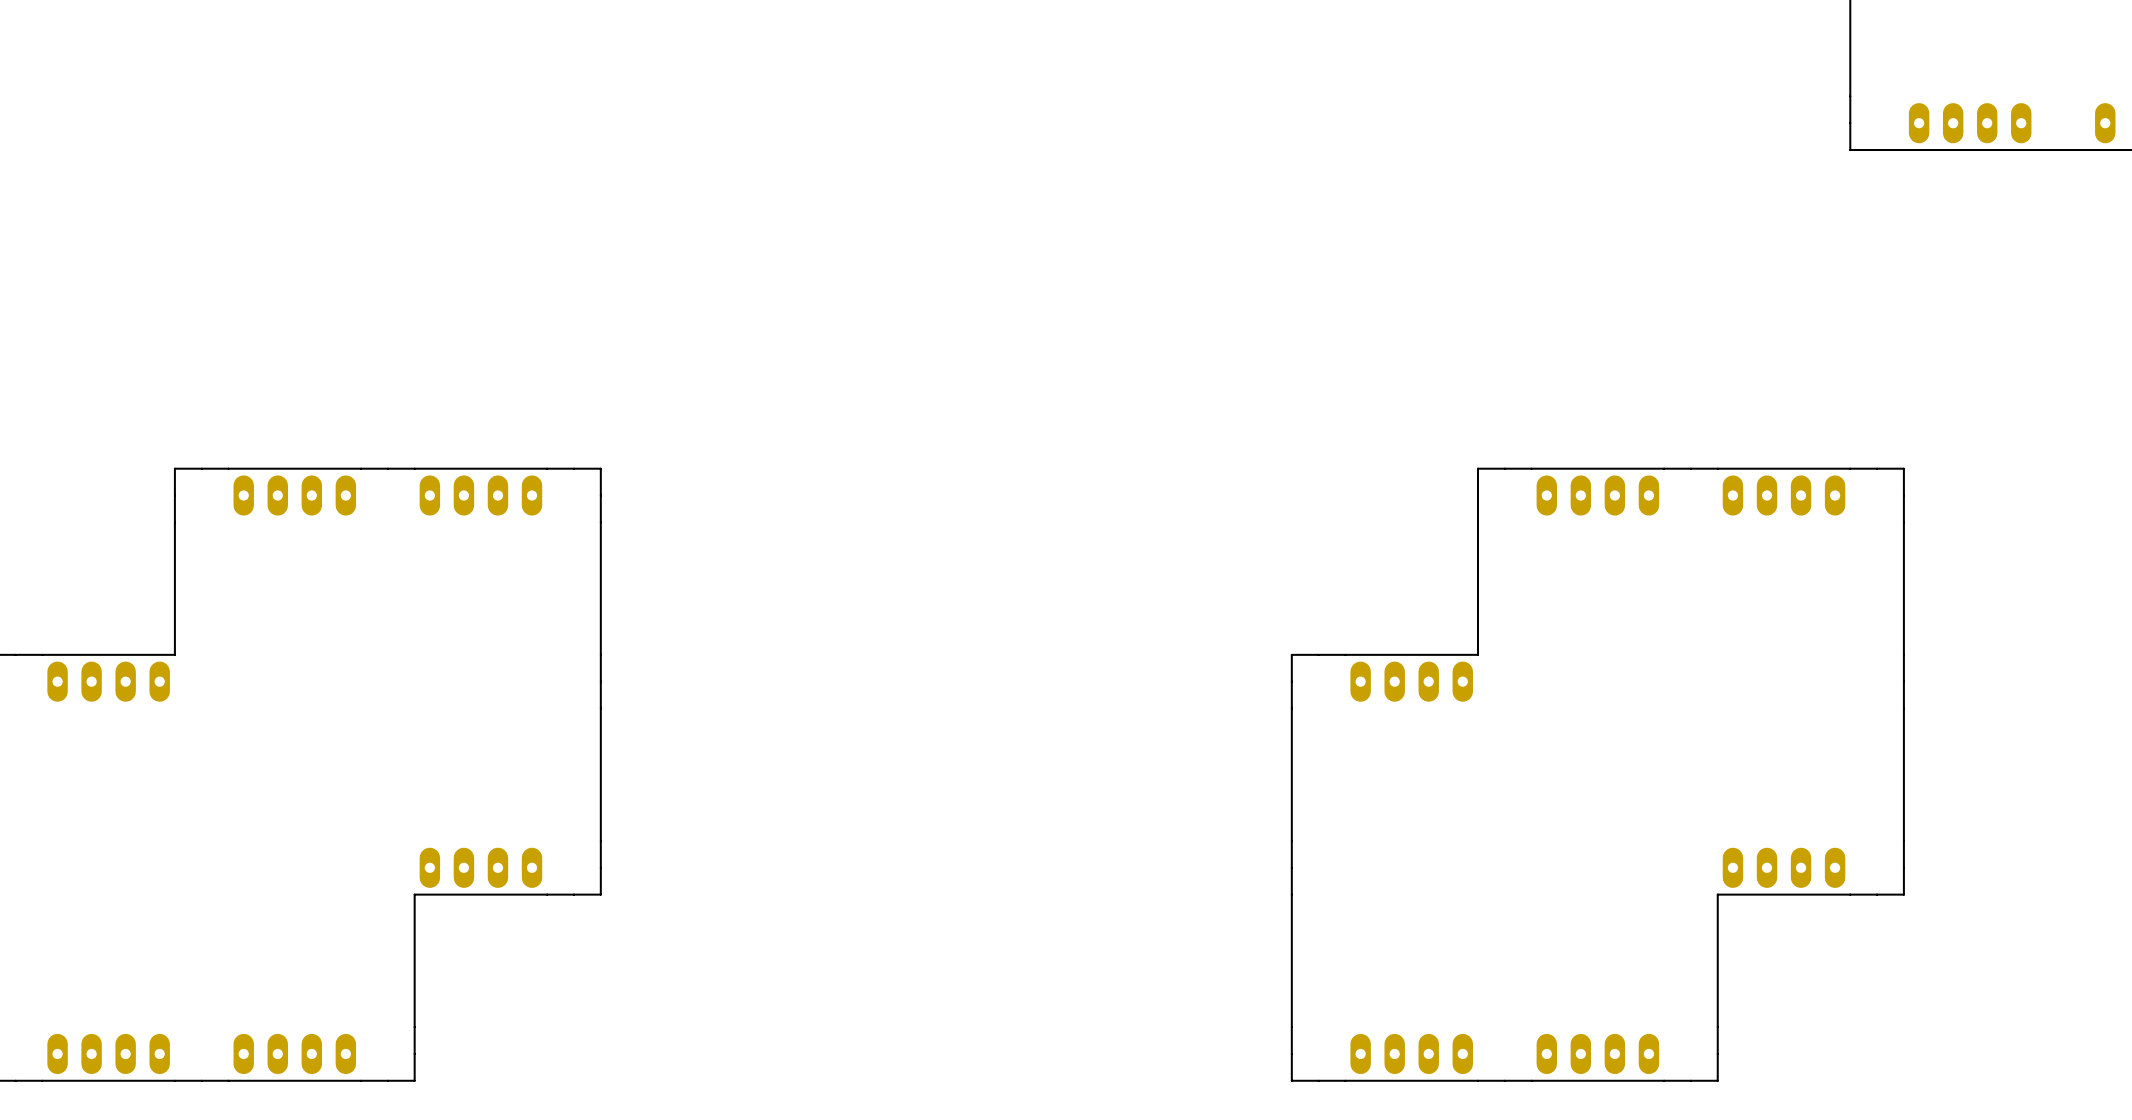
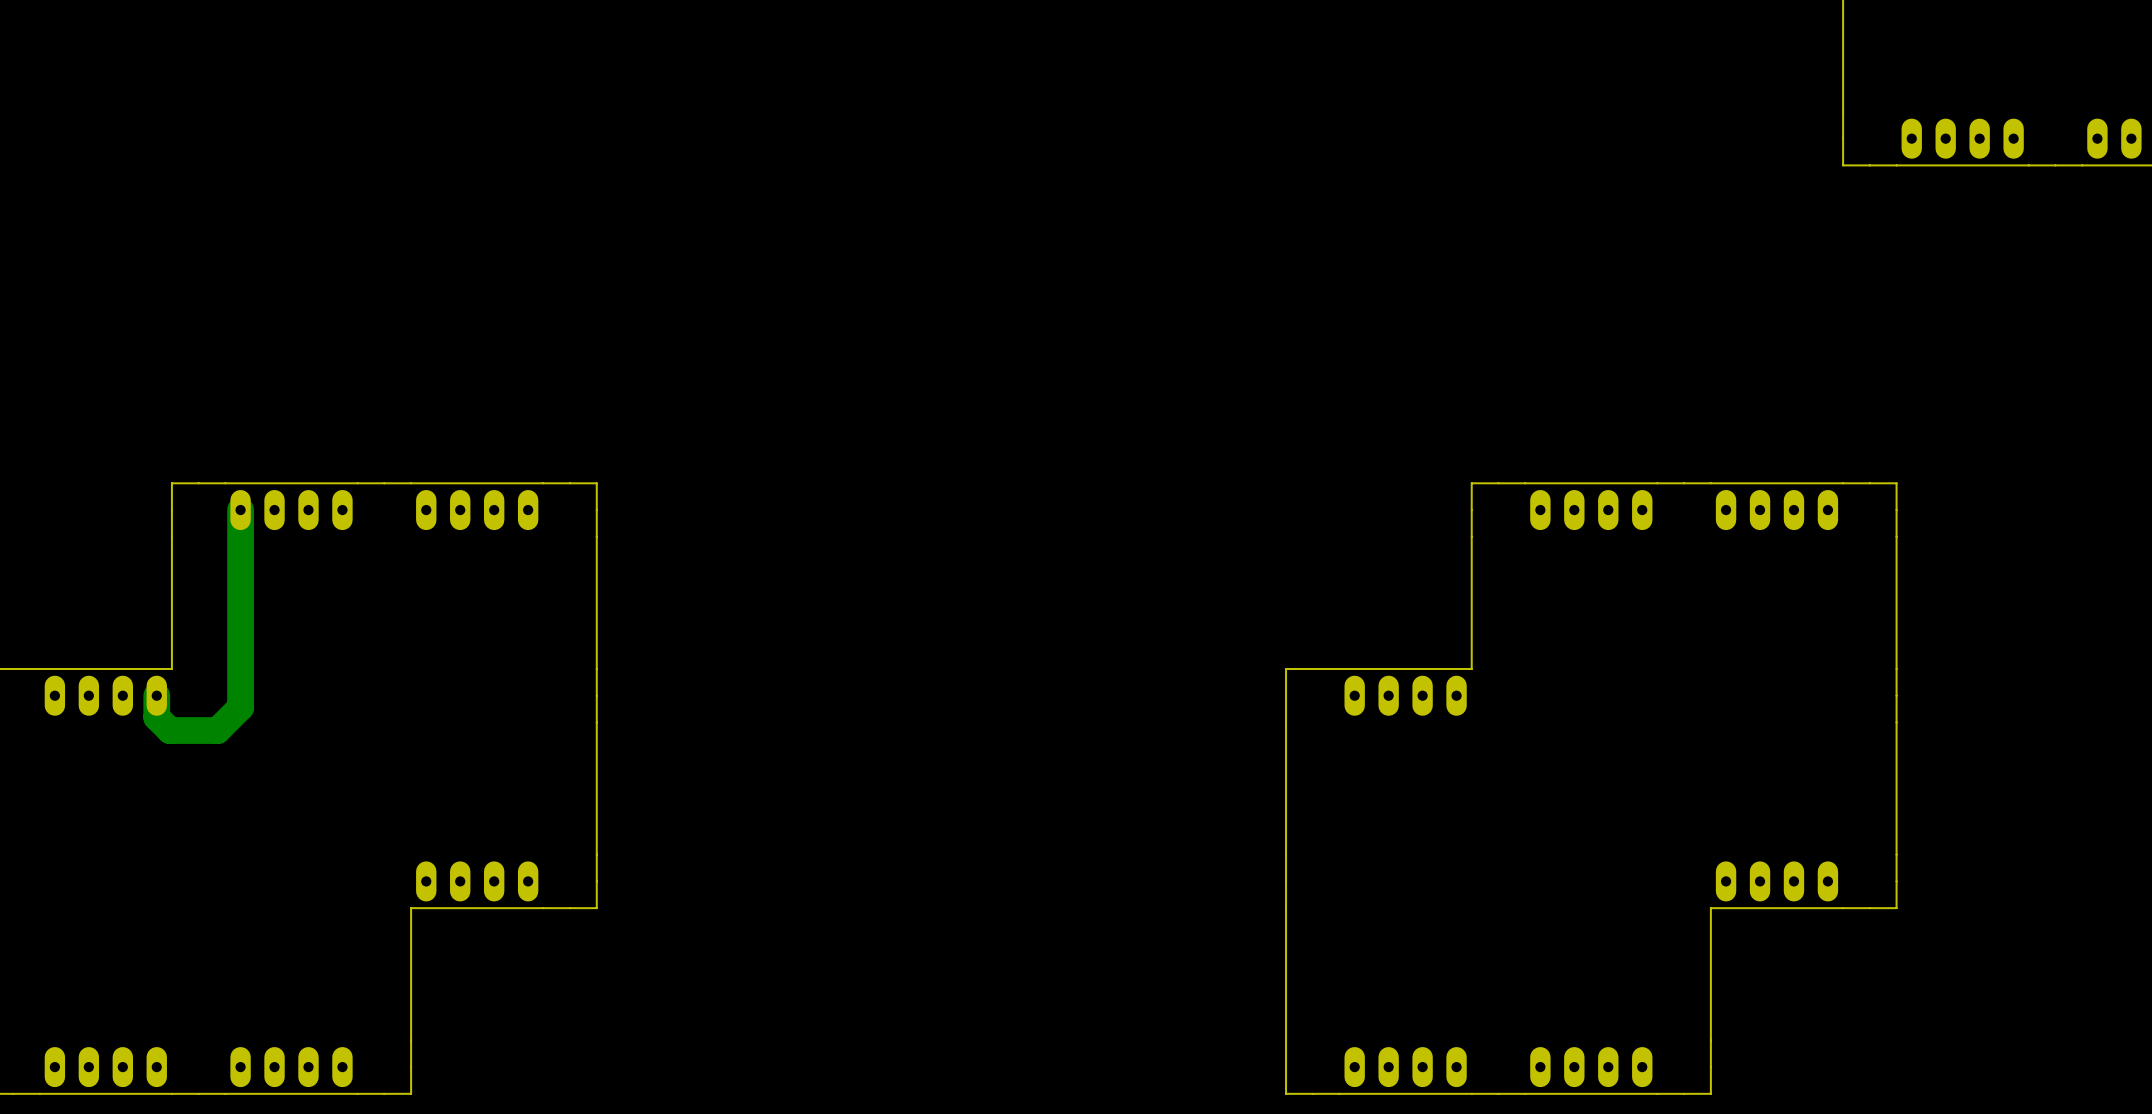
bottom track: none -> (240, 510) (240, 707) (217, 730) (169, 730) (156, 717) (156, 695)

